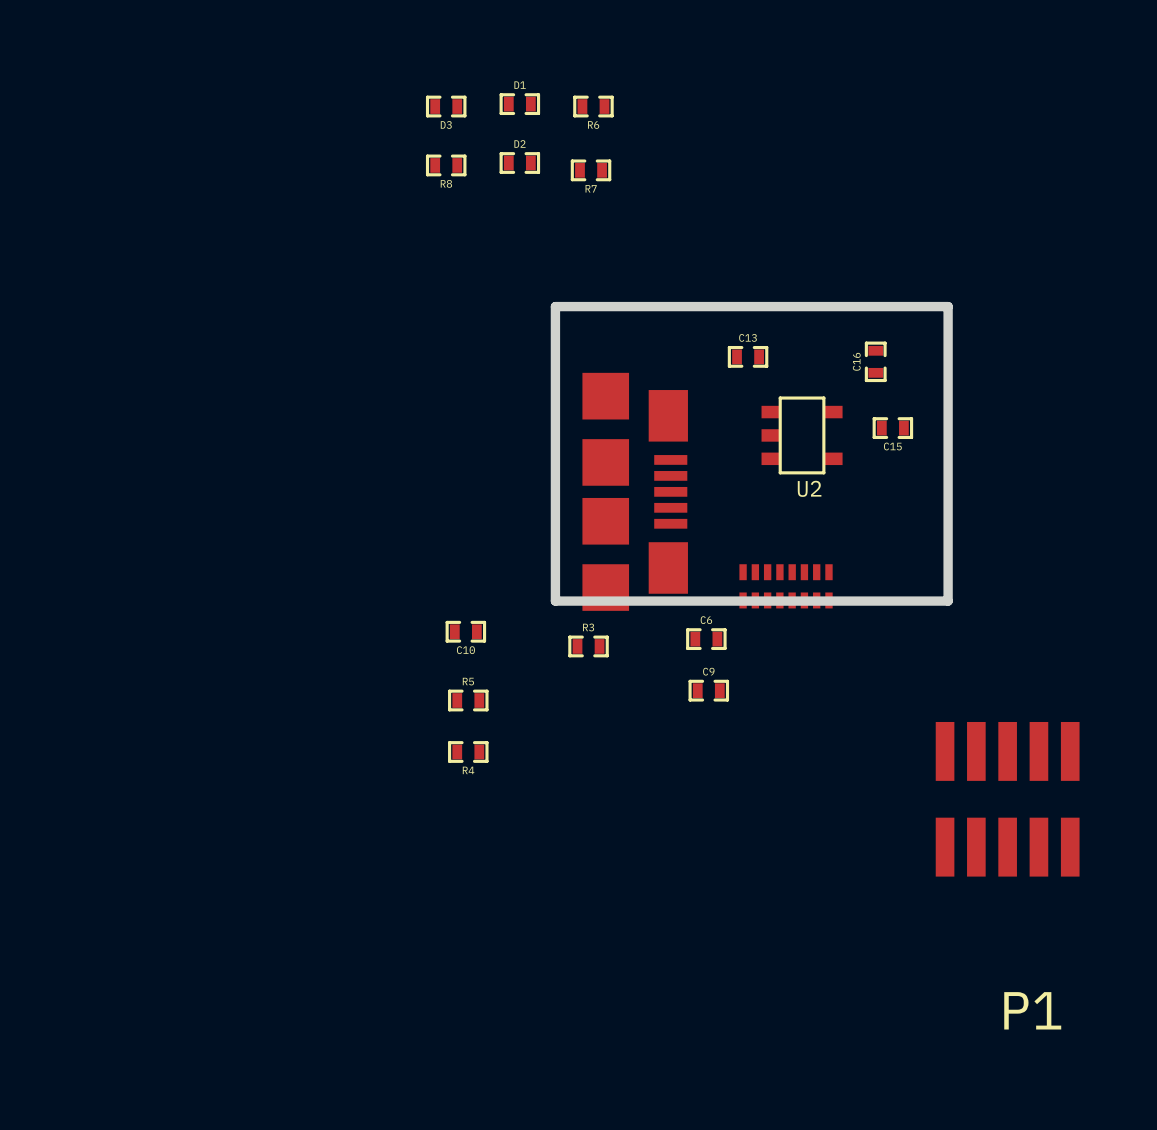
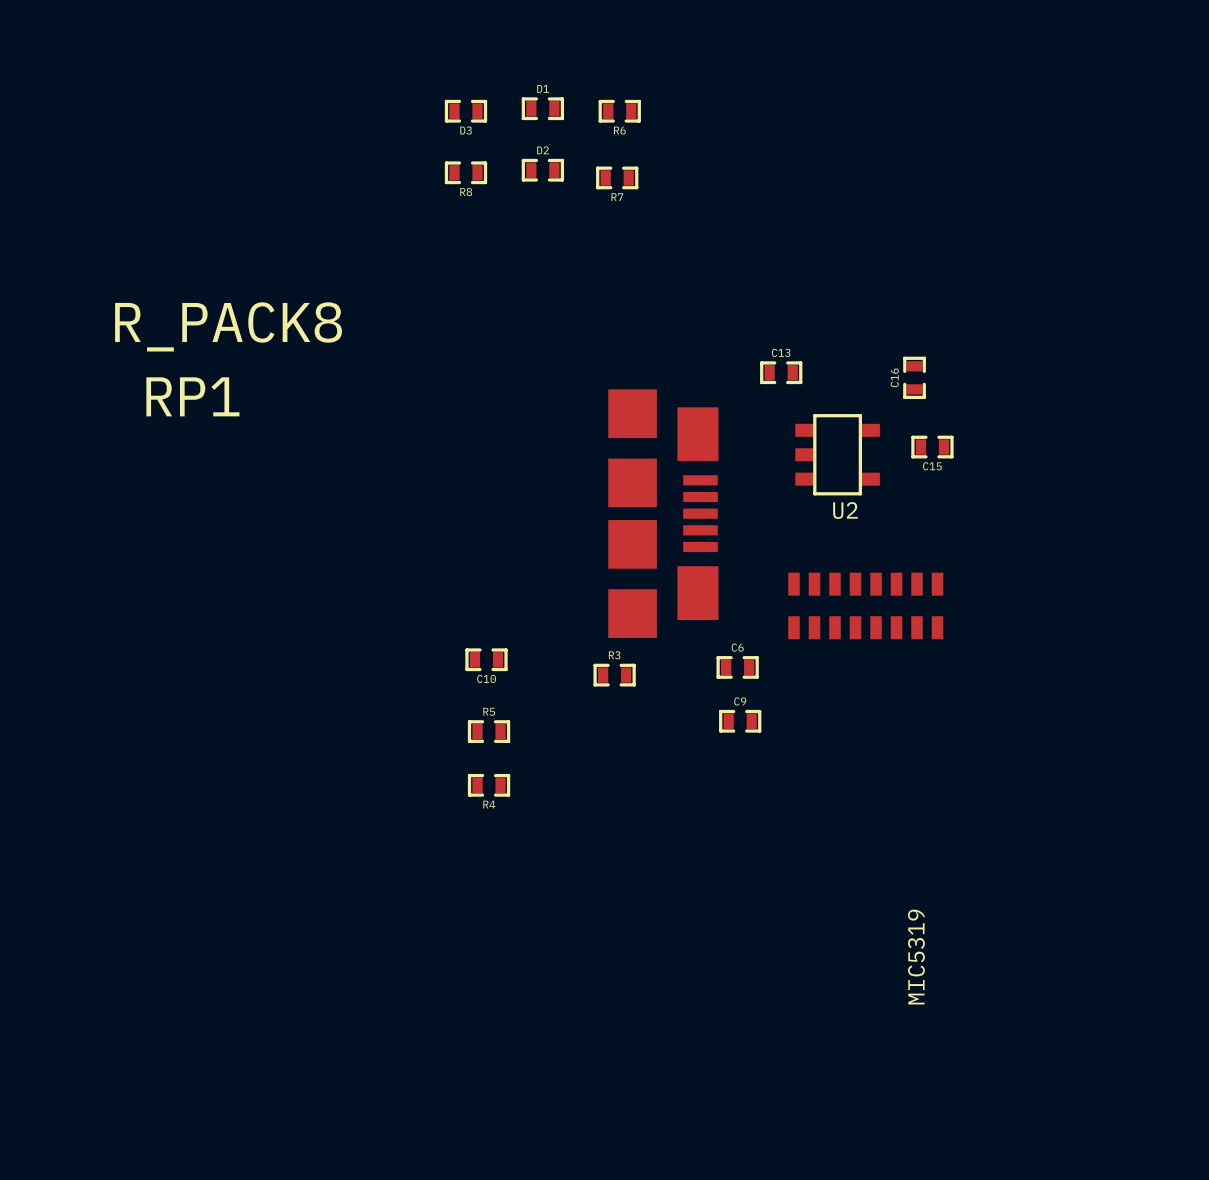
board edge: (555, 306) (948, 306) (948, 601) (555, 601) (555, 306) -> none
RP1: none -> R_PACK8 (865, 605)
part: (786, 586) -> none
P1: (1007, 799) -> none
U2 value: none -> MIC5319 (916, 957)

